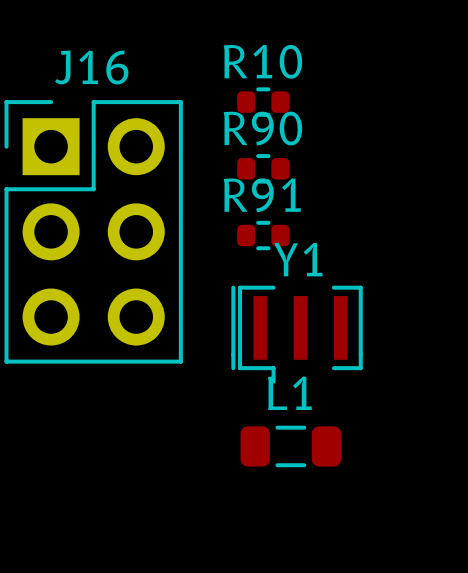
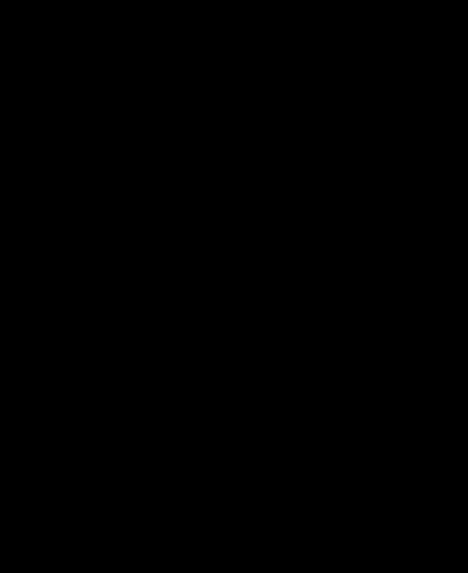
R10: (263, 102) -> none
R90: (263, 168) -> none
J16: (93, 231) -> none
R91: (263, 235) -> none
Y1: (297, 334) -> none
L1: (290, 446) -> none

